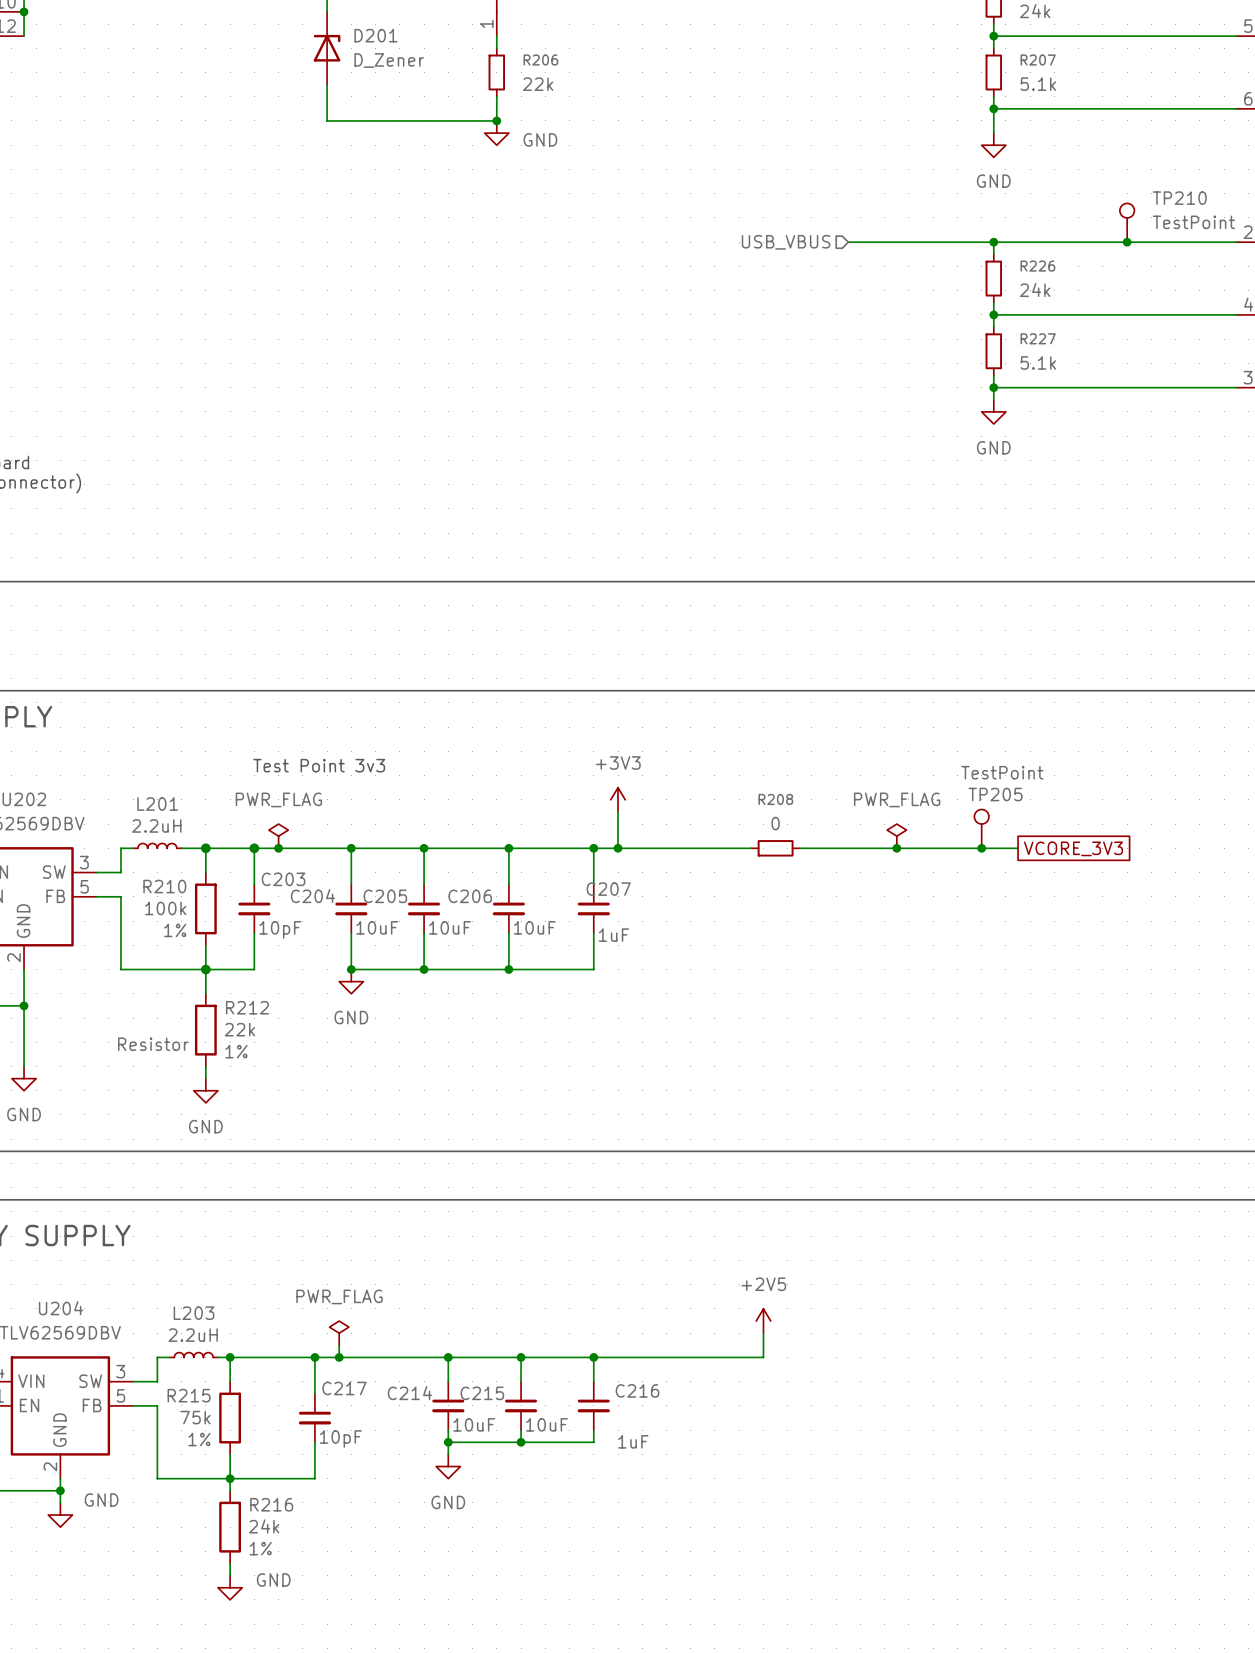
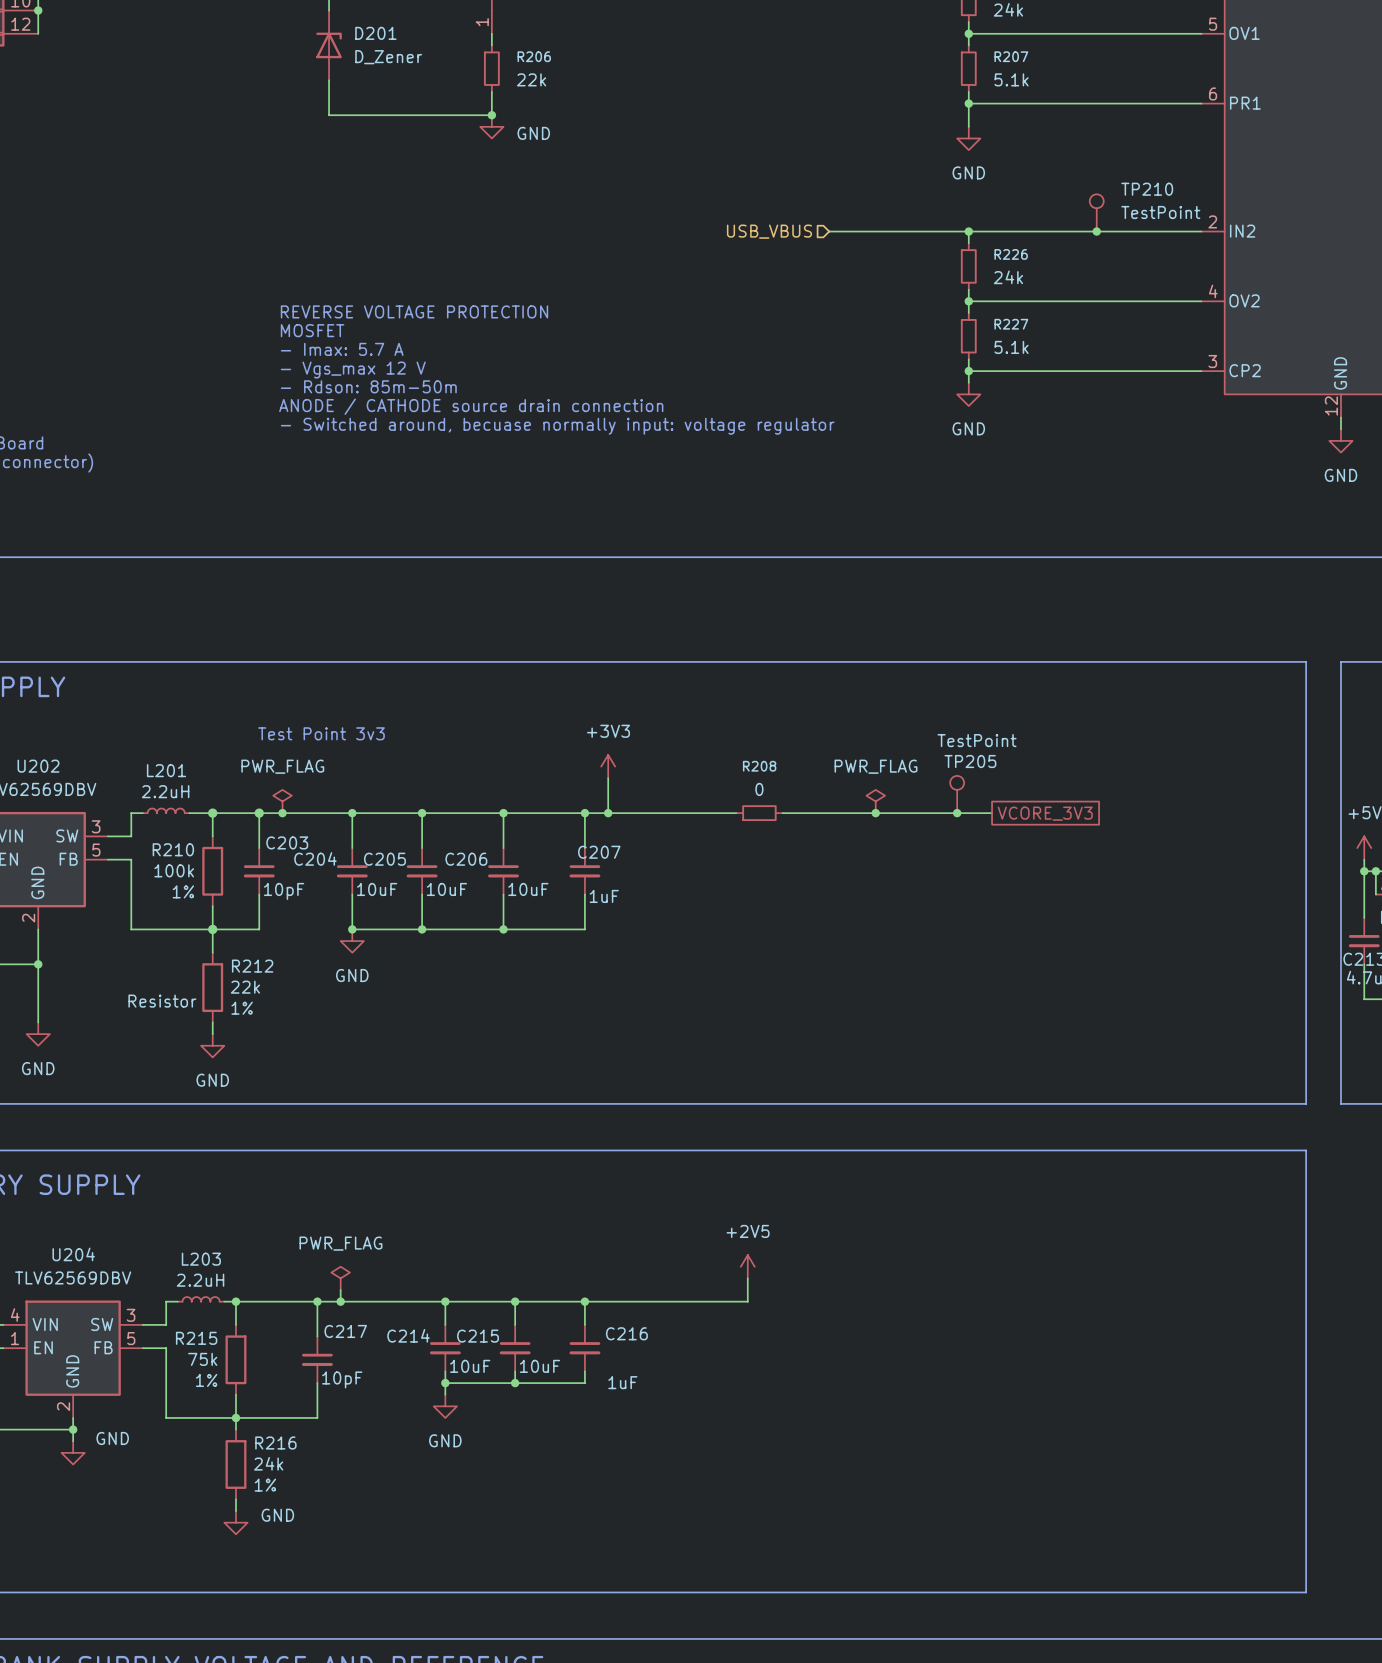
text: none -> REVERSE VOLTAGE PROTECTION (414, 311)
text: none -> MOSFET (312, 330)
text: none -> - Imax: 5.7 A (342, 349)
text: none -> - Vgs_max 12 V (353, 370)
text: none -> - Rdson: 85m-50m (368, 386)
text: none -> ANODE / CATHODE source drain connection (471, 406)
text: none -> - Switched around, becuase normally input: voltage regulator (557, 426)

